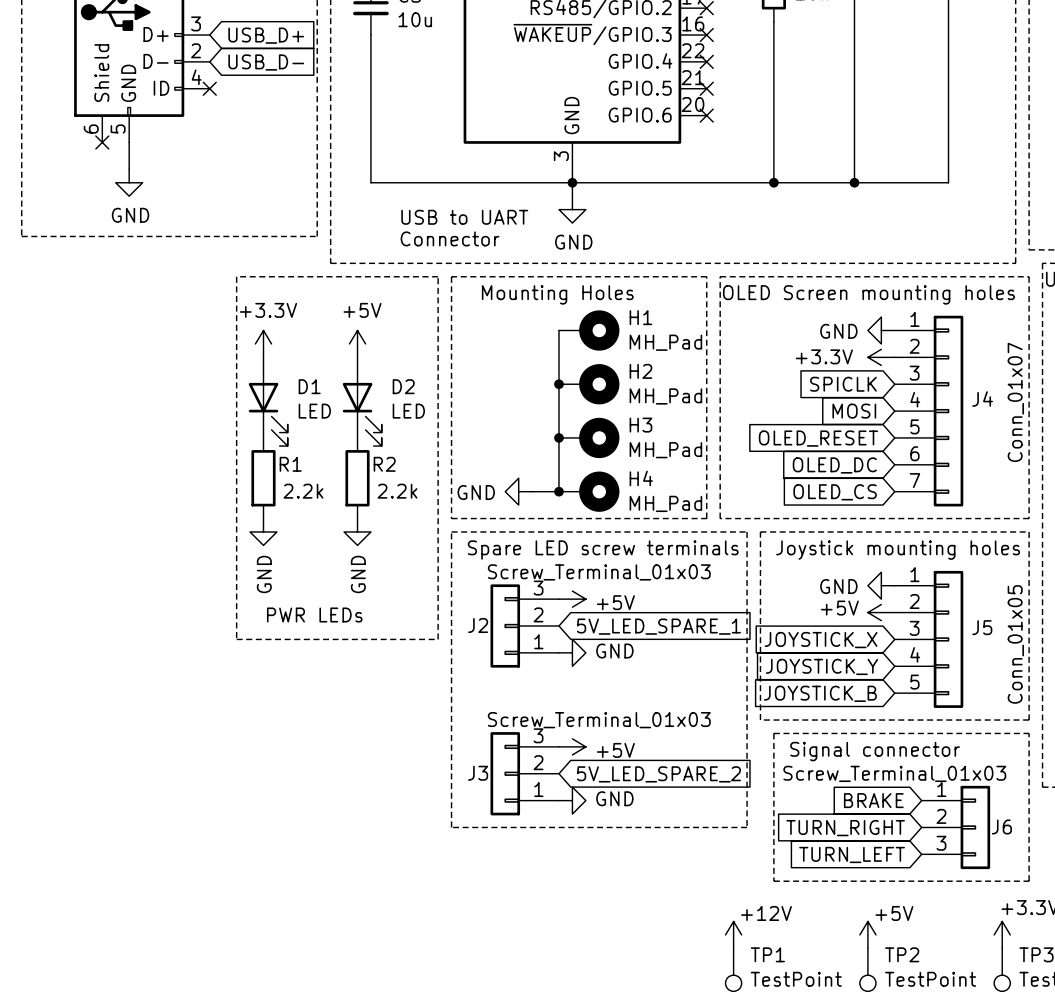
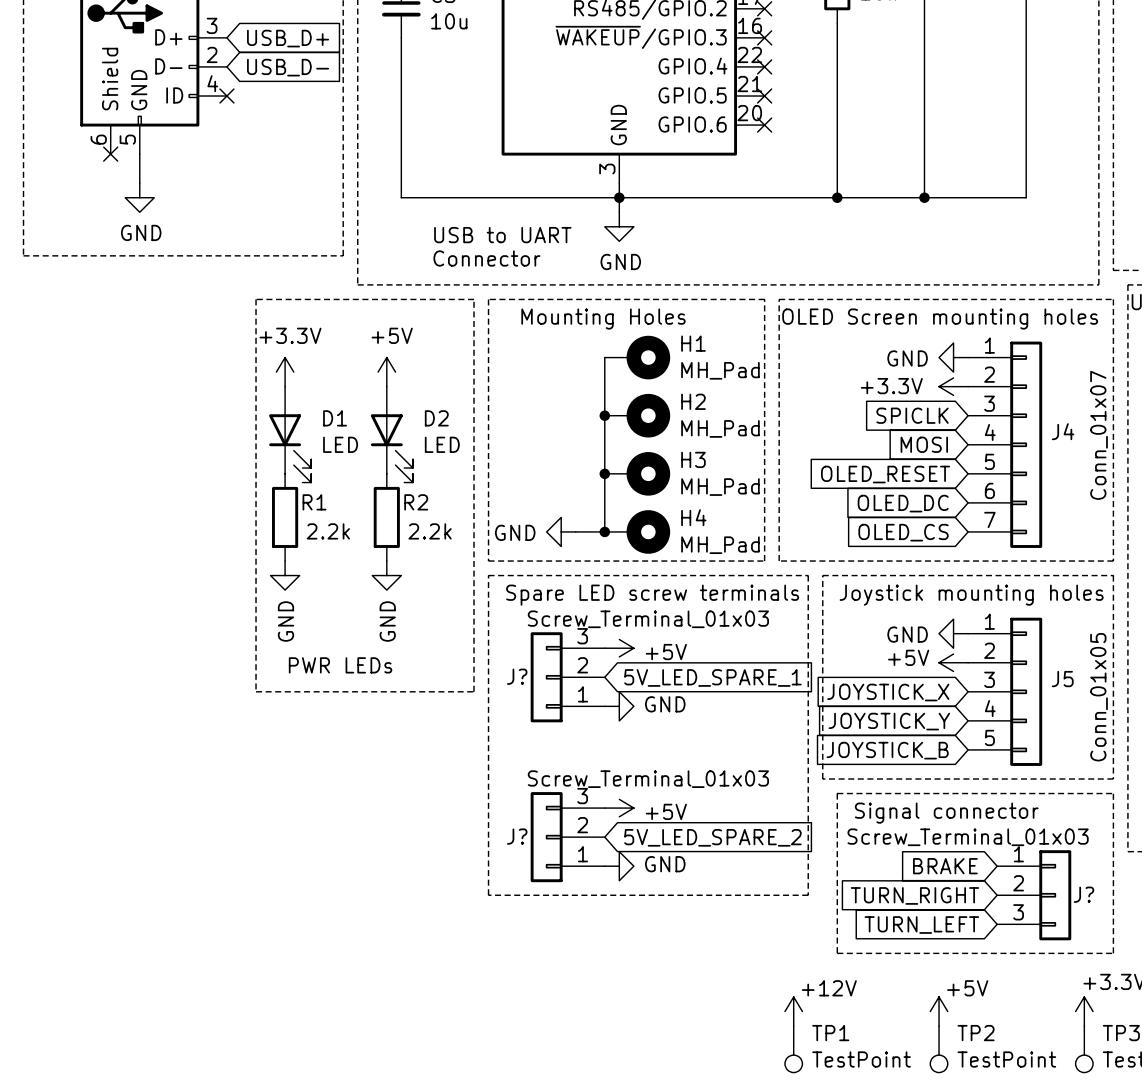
J2 name: J2 (478, 625) -> J? (517, 676)
J3 name: J3 (478, 773) -> J? (517, 836)
J6 name: J6 (1001, 826) -> J? (1083, 894)

